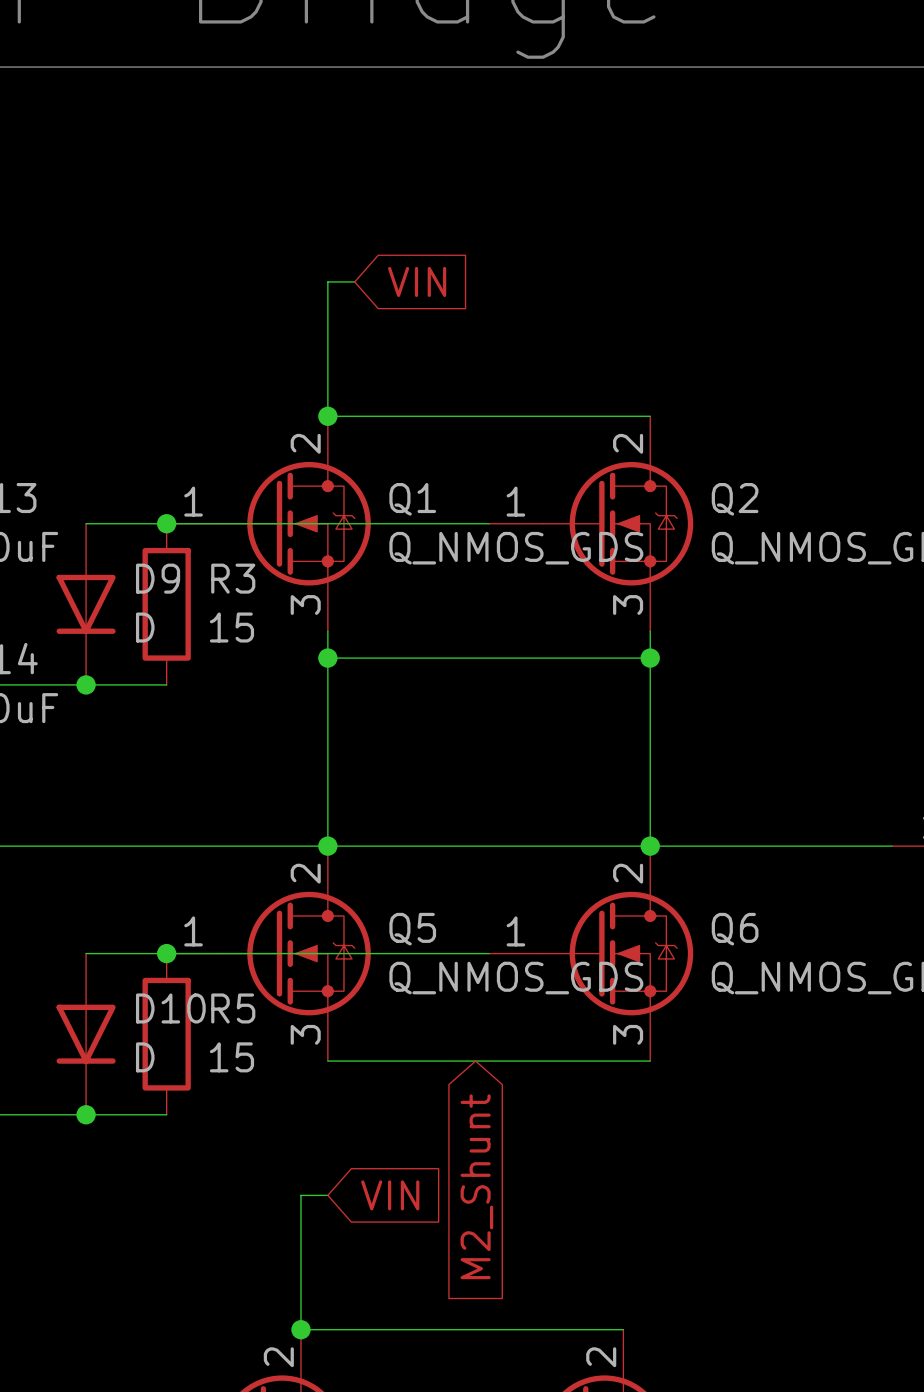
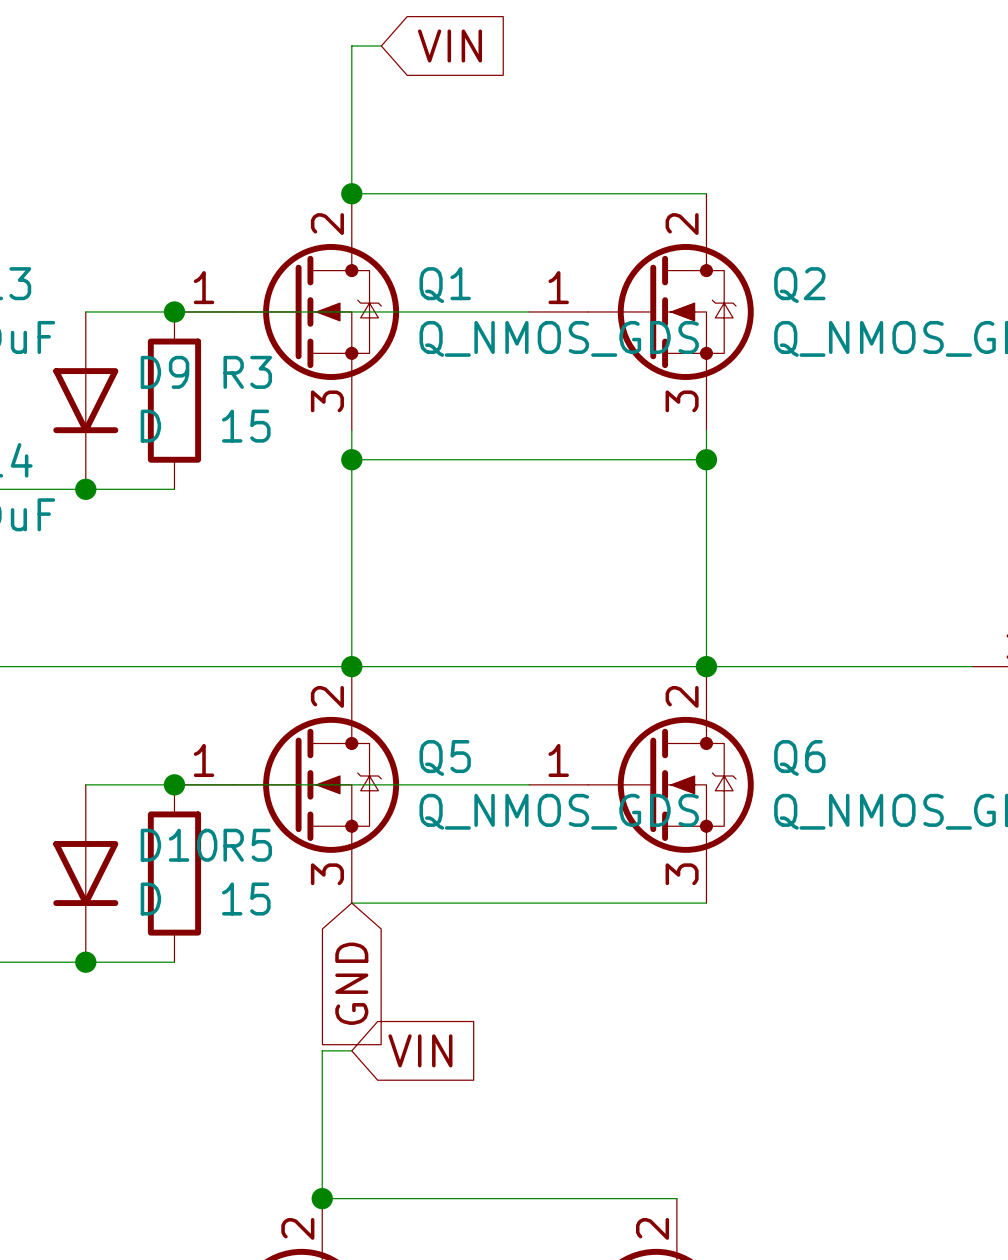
global label: none -> GND (351, 983)
global label: M2_Shunt (476, 1186) -> none

